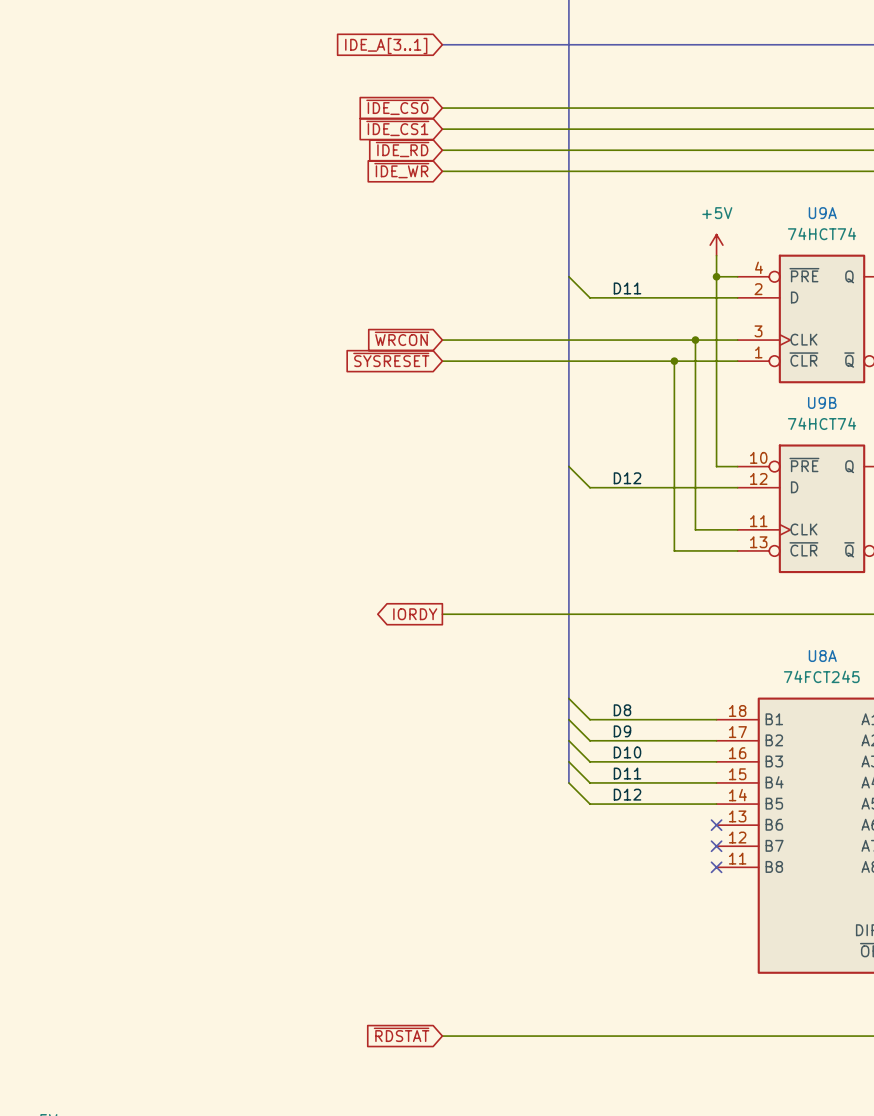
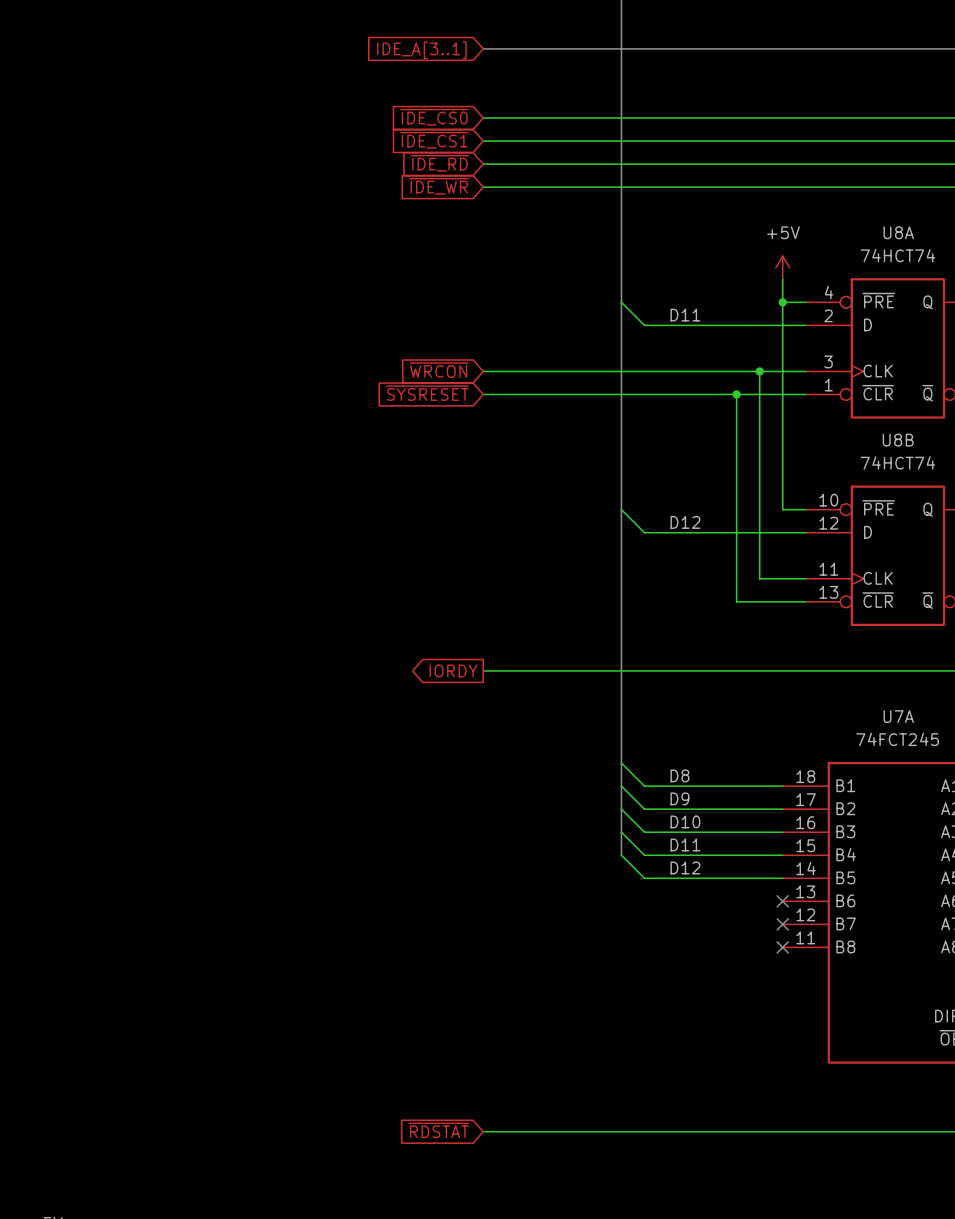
U9A name: U9A (822, 213) -> U8A (898, 232)
U9B name: U9B (822, 402) -> U8B (898, 440)
U8A name: U8A (822, 656) -> U7A (898, 716)

